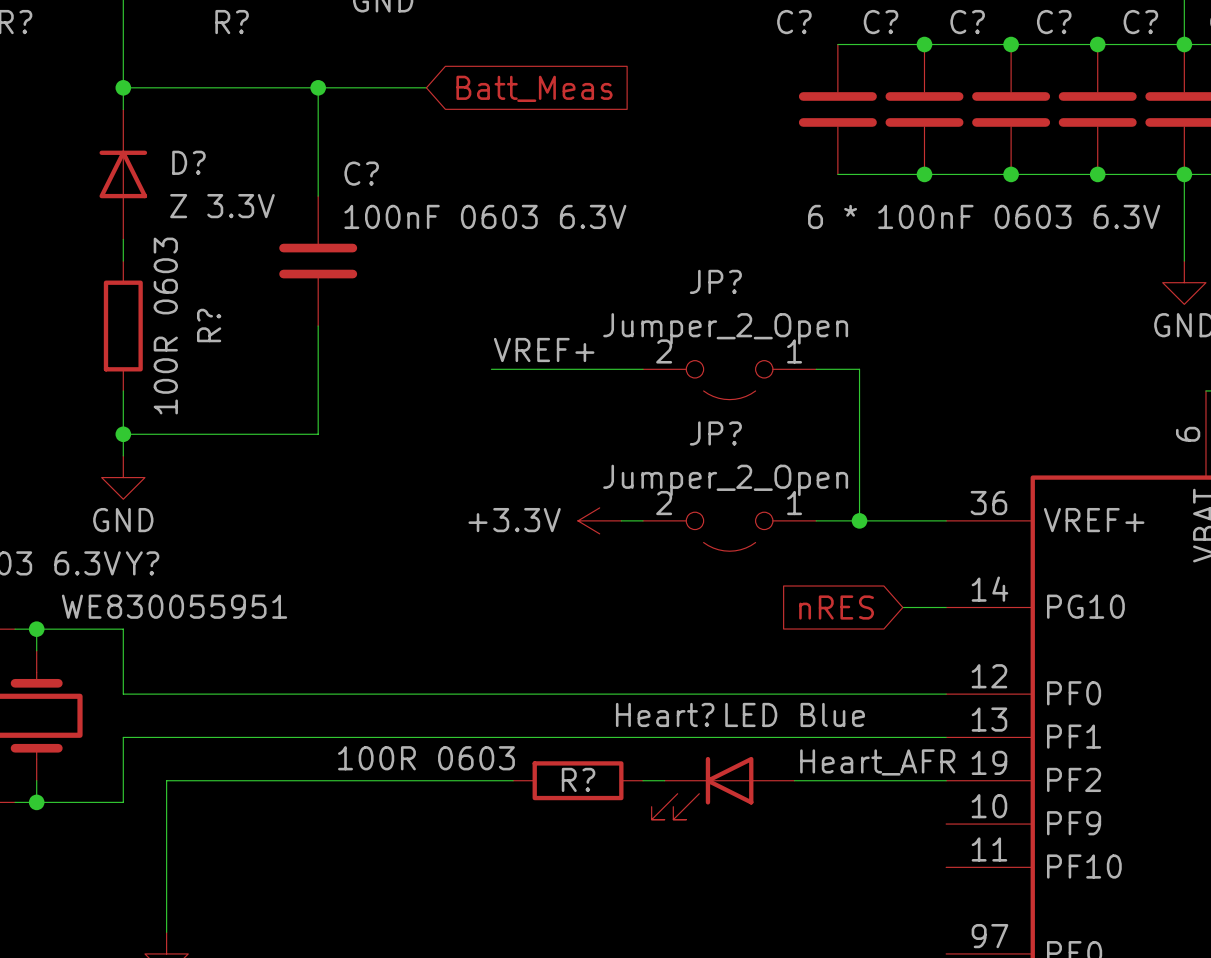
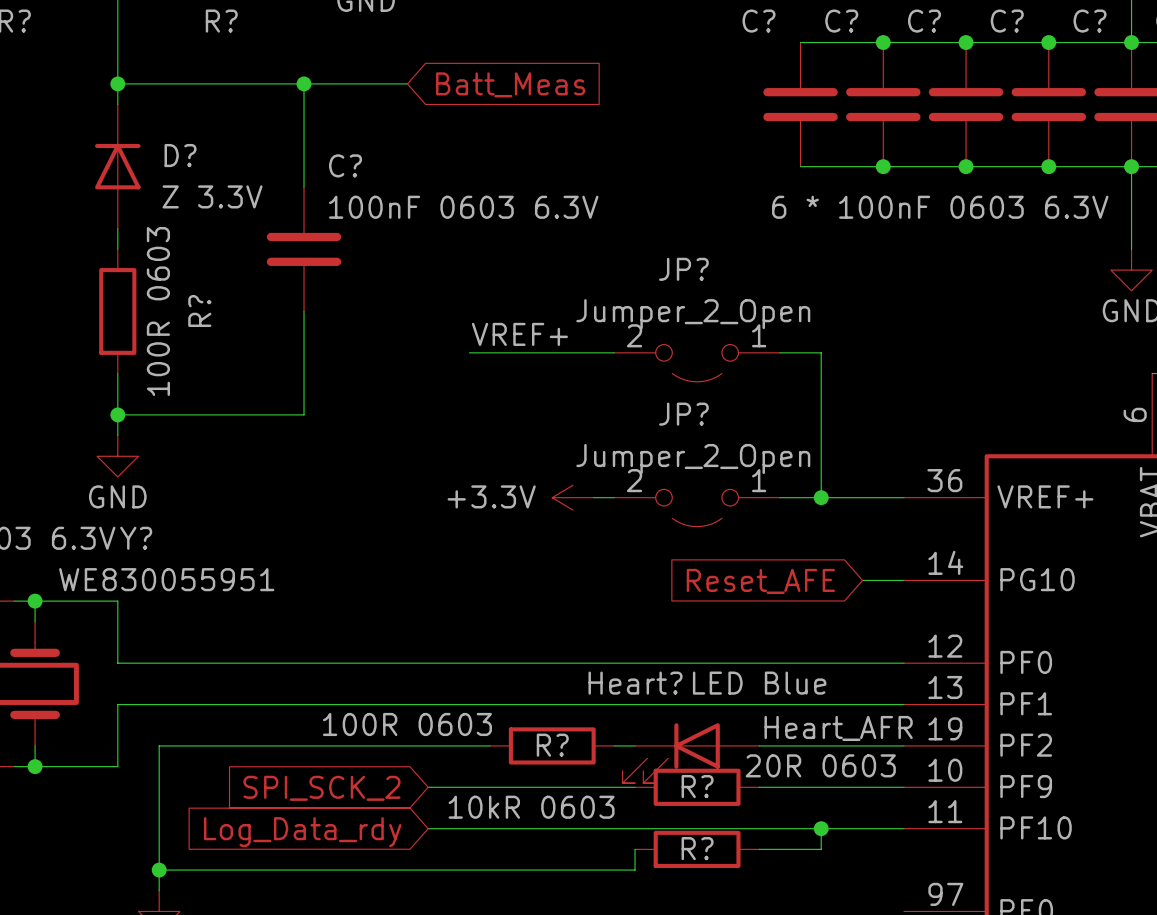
global label: nRES (836, 607) -> Reset_AFE (760, 581)
wire: none -> (428, 787) (635, 787)
R?: none -> 20R 0603 (697, 787)
wire: none -> (759, 787) (903, 787)
global label: none -> SPI_SCK_2 (321, 788)
wire: none -> (428, 828) (903, 828)
wire: none -> (821, 828) (821, 849) (759, 849)
junction: none -> (821, 828)
global label: none -> Log_Data_rdy (302, 832)
wire: none -> (635, 849) (635, 870) (159, 870)
R?: none -> 10kR 0603 (697, 849)
junction: none -> (159, 870)

